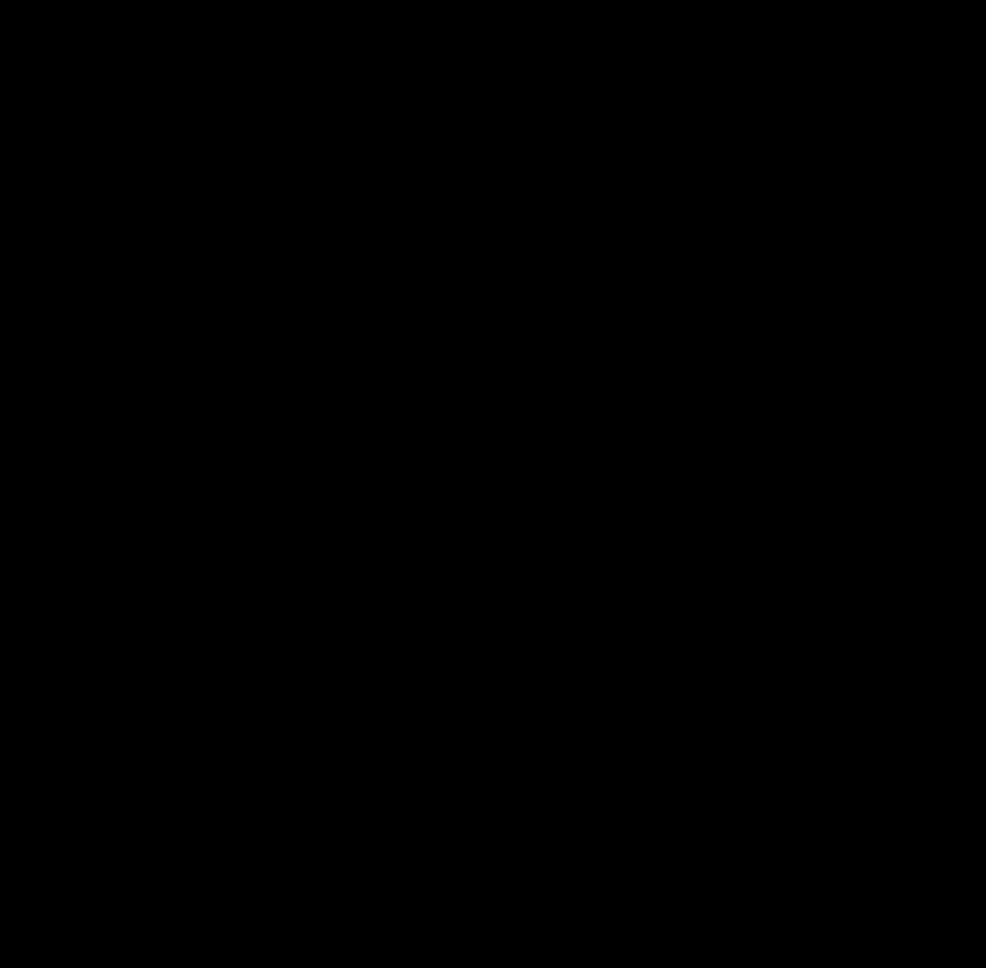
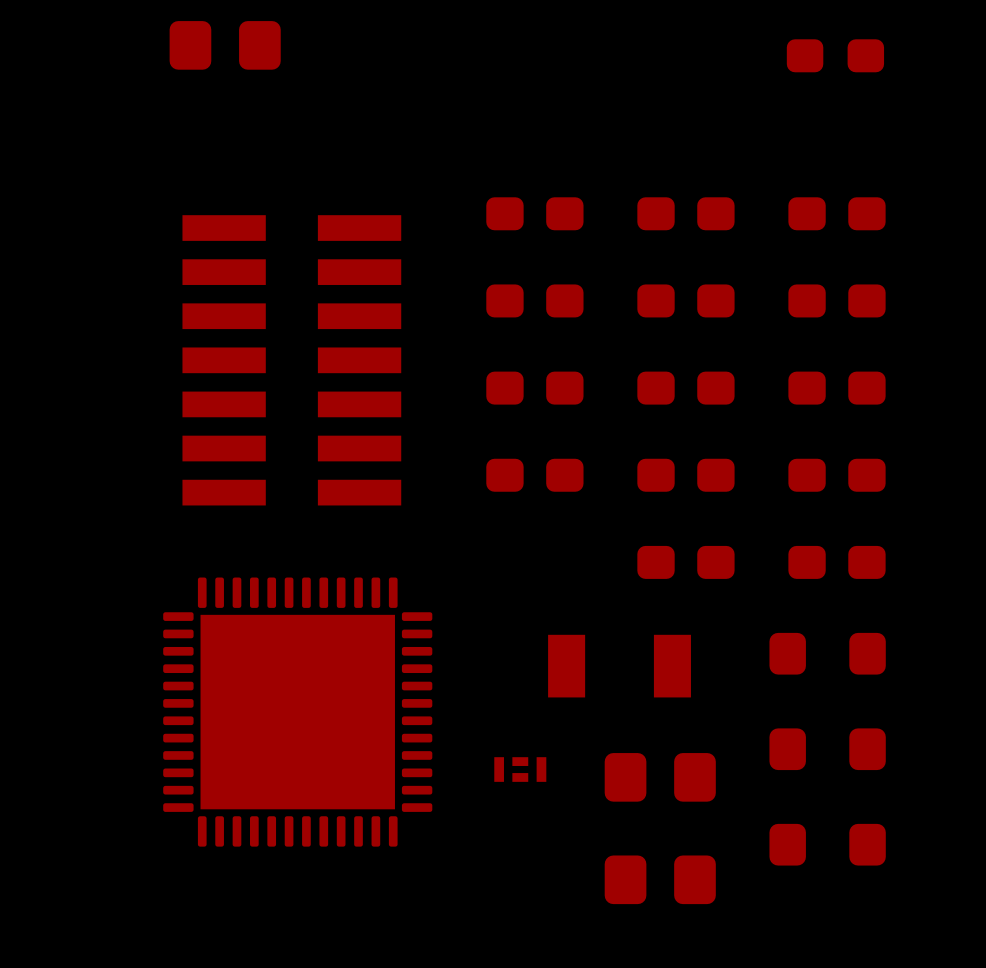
part: none -> (225, 45)
part: none -> (835, 55)
part: none -> (534, 213)
part: none -> (685, 213)
part: none -> (837, 213)
part: none -> (534, 300)
part: none -> (685, 300)
part: none -> (837, 300)
part: none -> (291, 360)
part: none -> (534, 388)
part: none -> (685, 388)
part: none -> (837, 388)
part: none -> (534, 475)
part: none -> (685, 475)
part: none -> (837, 475)
part: none -> (685, 562)
part: none -> (837, 562)
part: none -> (827, 653)
part: none -> (619, 666)
part: none -> (297, 712)
part: none -> (827, 749)
part: none -> (520, 769)
part: none -> (660, 777)
part: none -> (827, 844)
part: none -> (660, 879)

